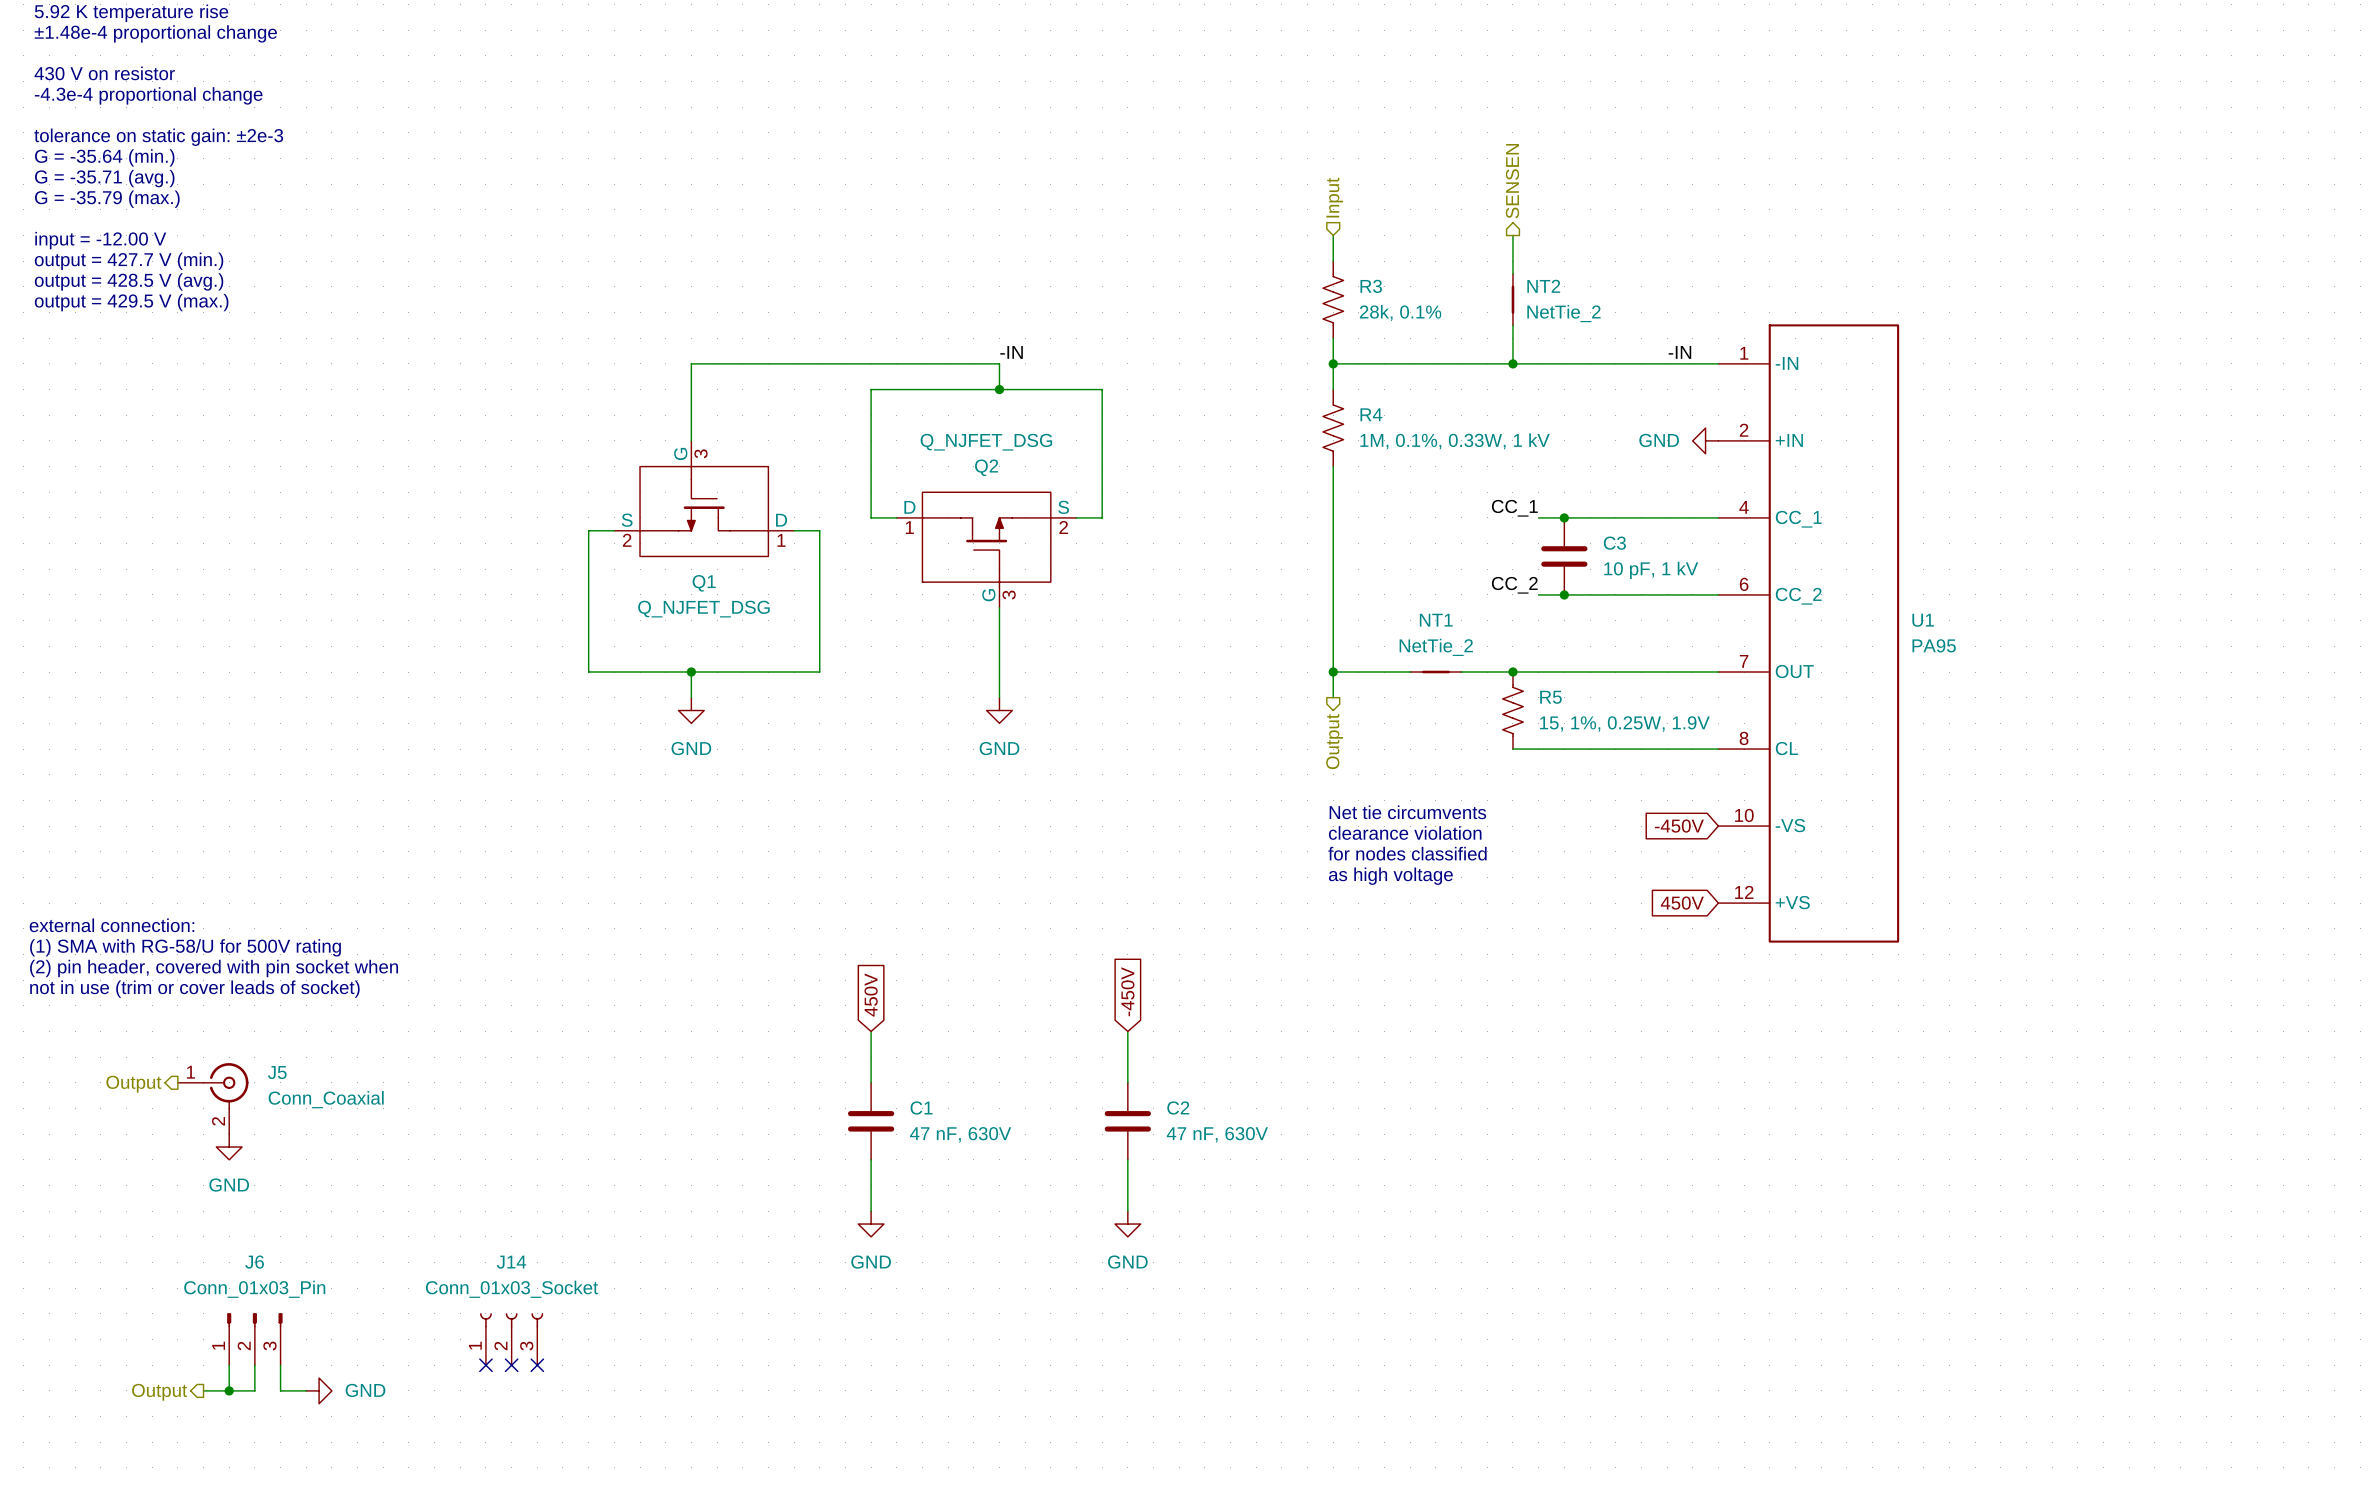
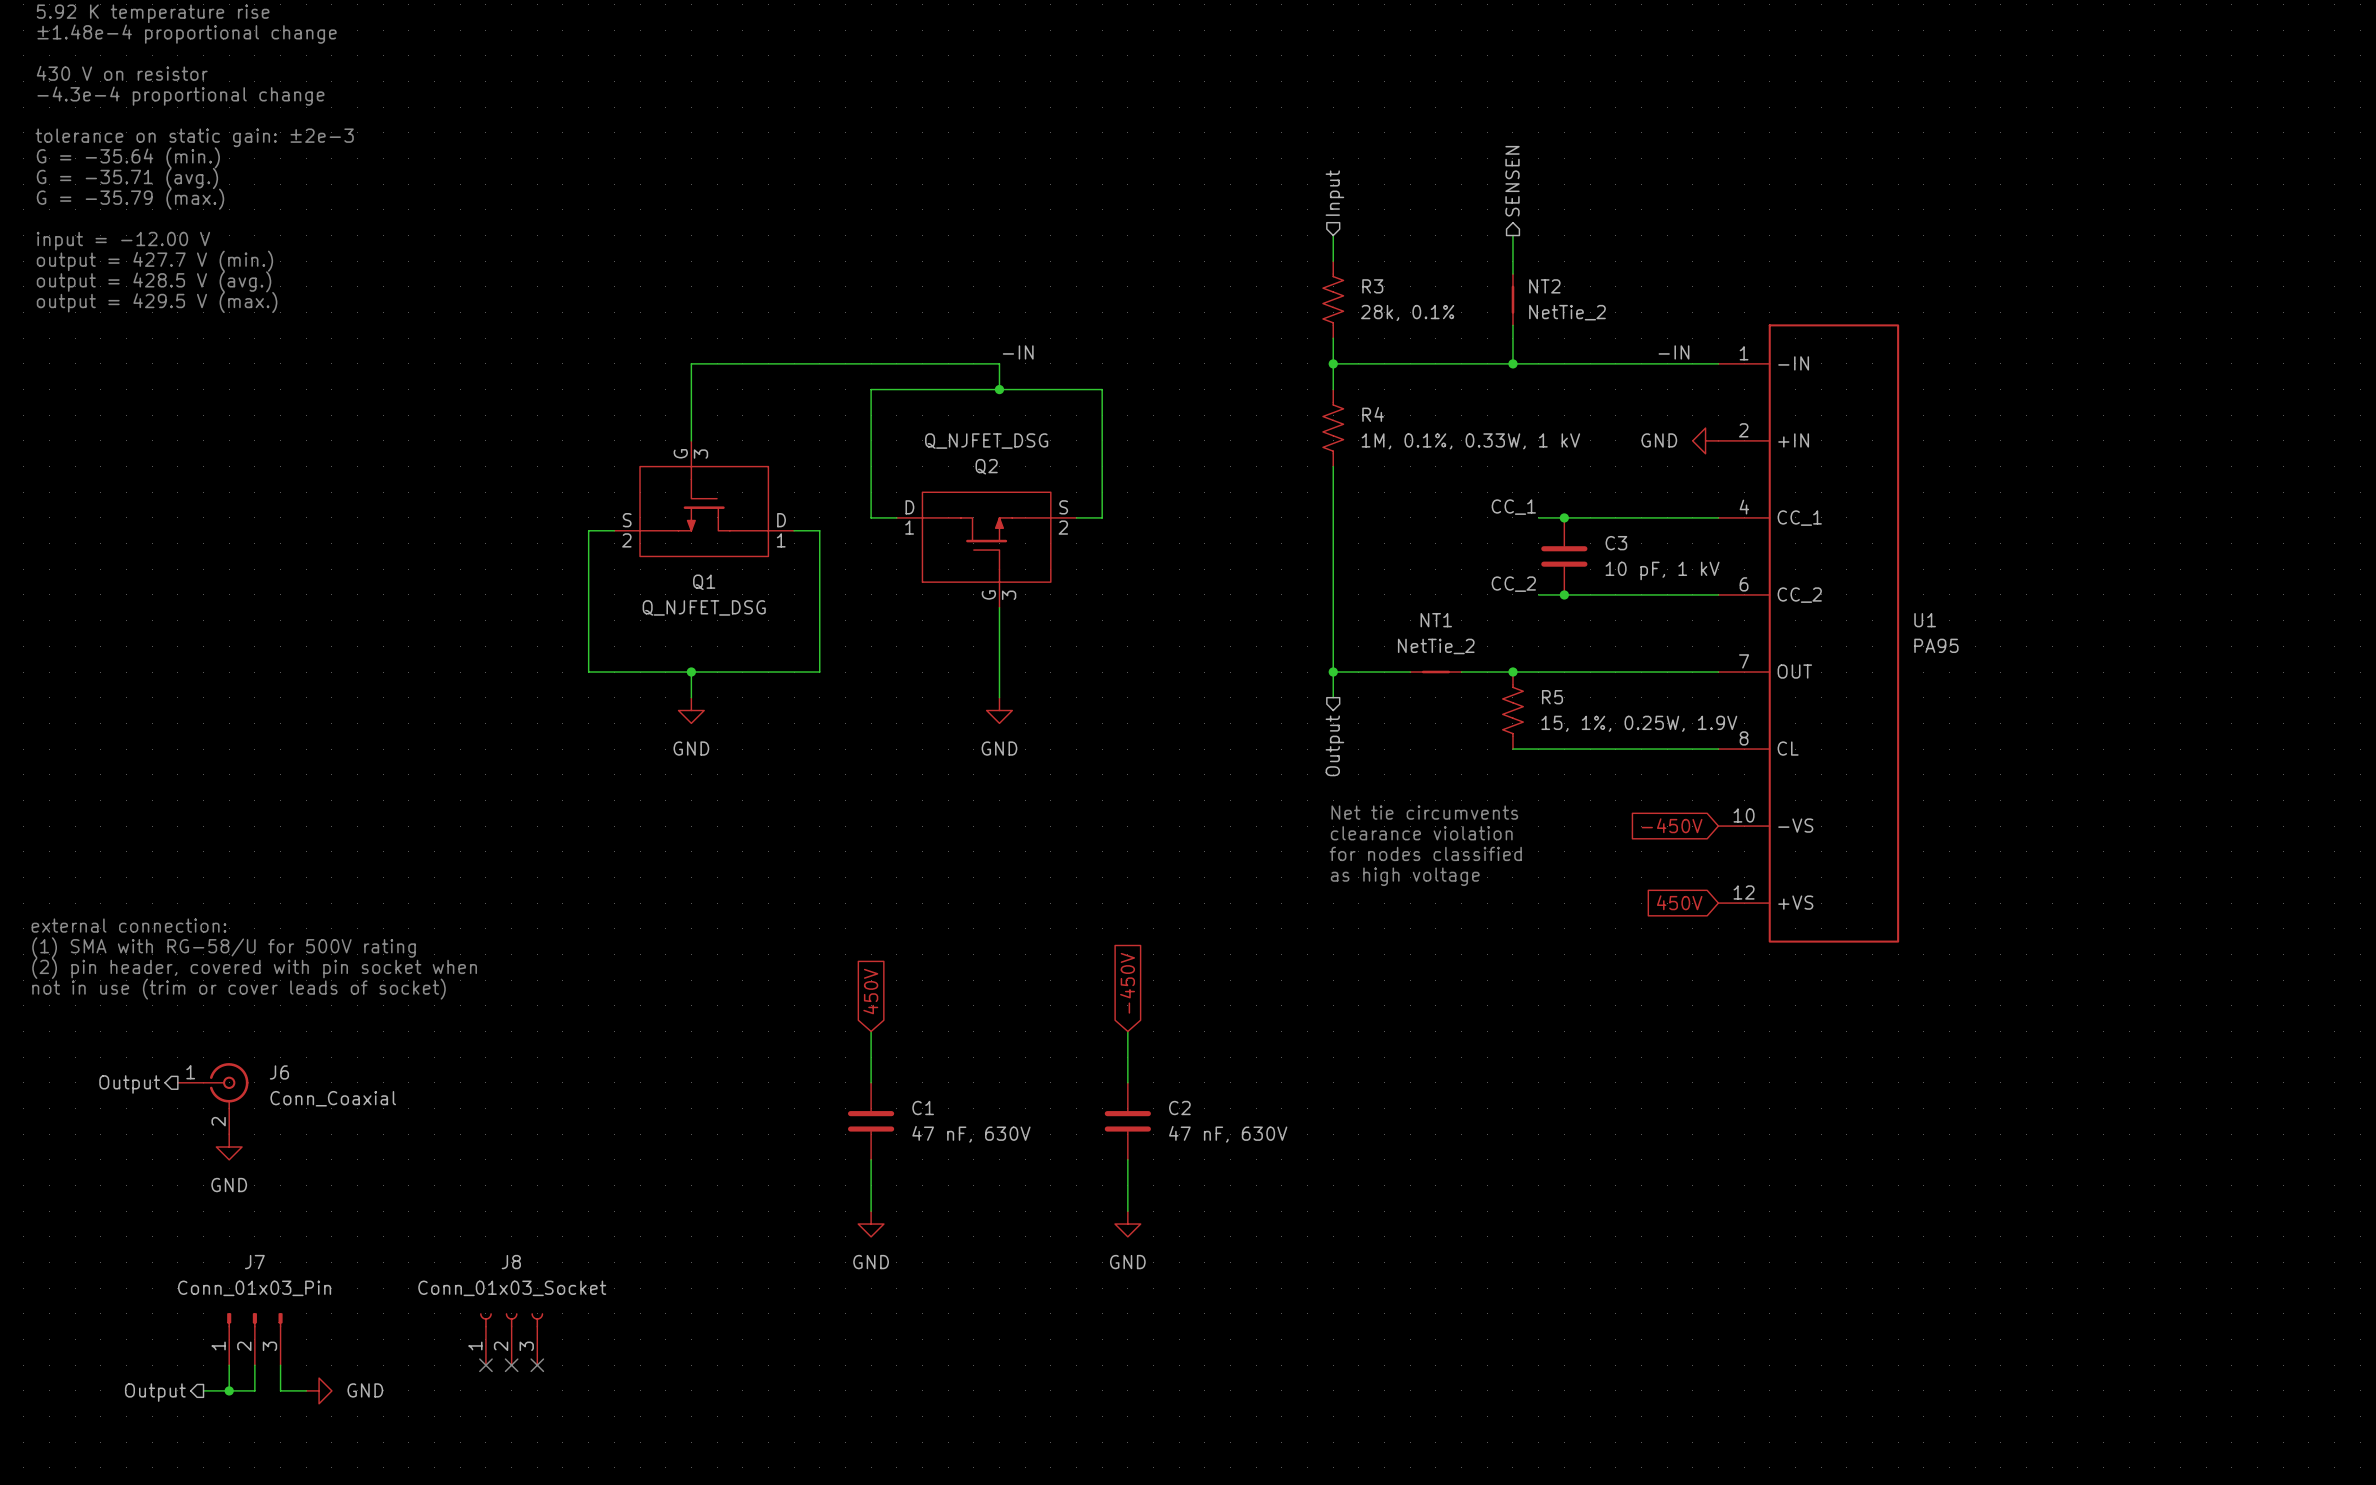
J5 name: J5 (277, 1072) -> J6 (279, 1072)
J6 name: J6 (254, 1262) -> J7 (254, 1262)
J14 name: J14 (511, 1262) -> J8 (511, 1262)

